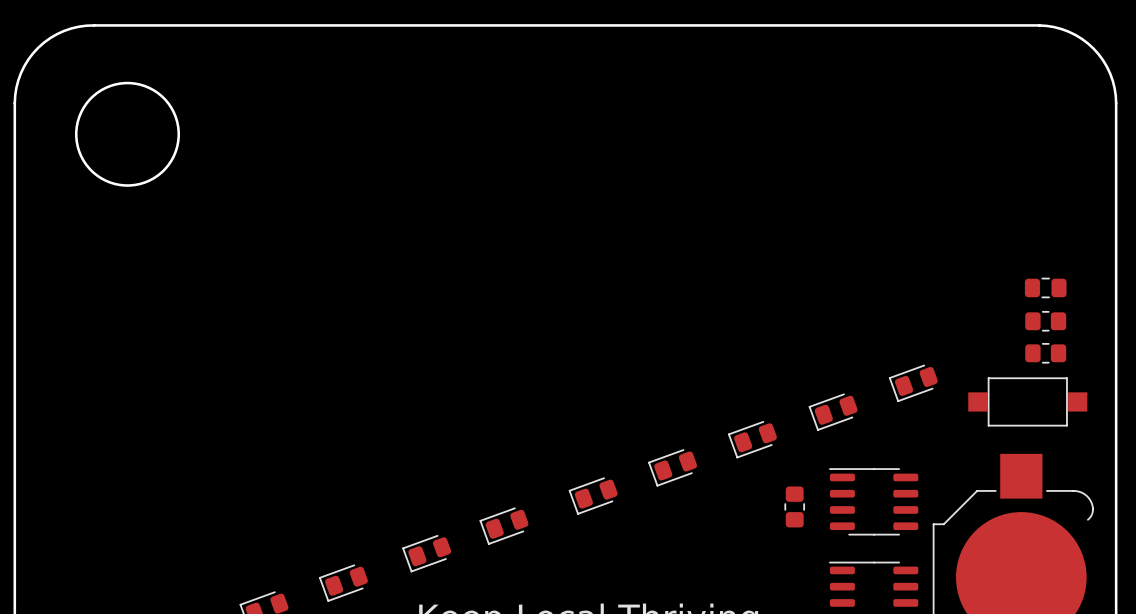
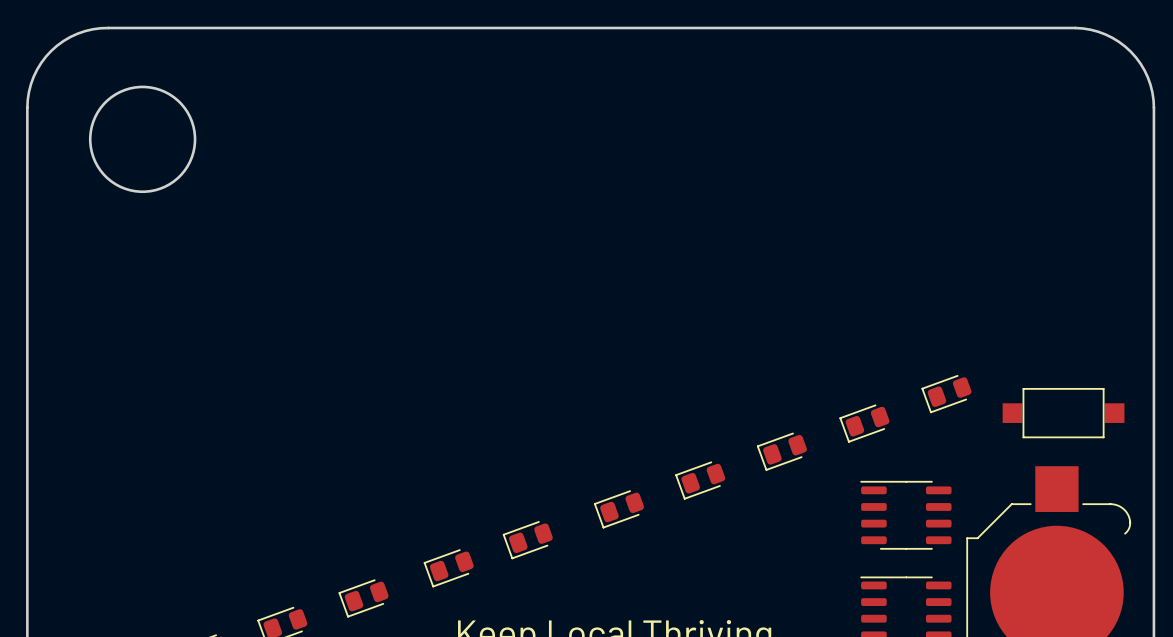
part: (1045, 287) -> none
part: (1045, 321) -> none
part: (1045, 353) -> none
part: (794, 506) -> none

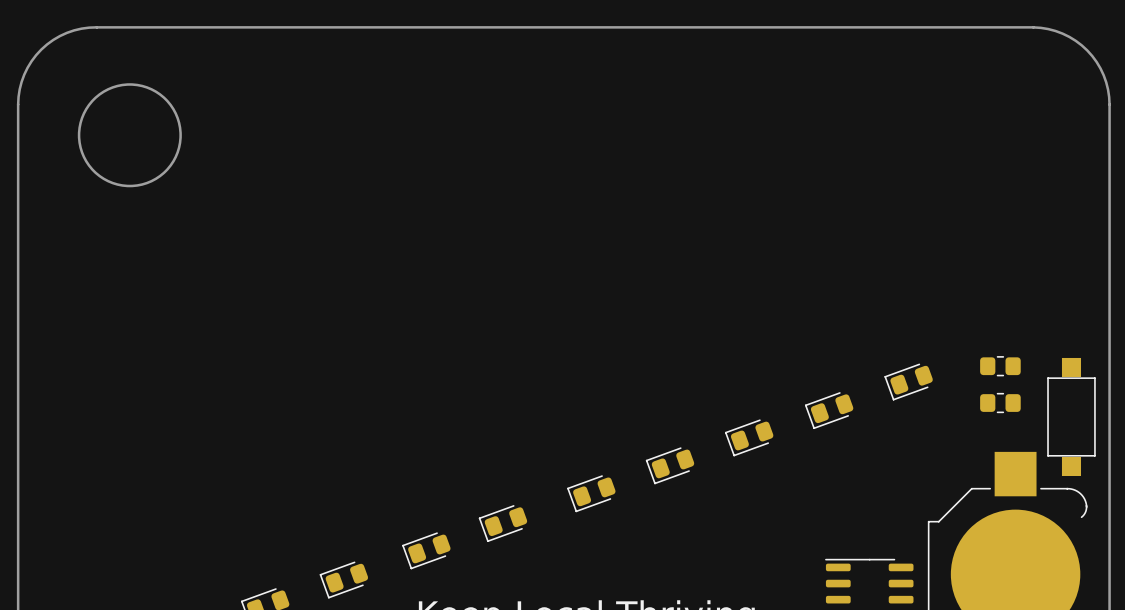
part: none -> (1000, 366)
part rotation: 0° (1063, 413) -> 90° clockwise (1071, 416)
part: none -> (1000, 403)
part: (905, 515) -> none

